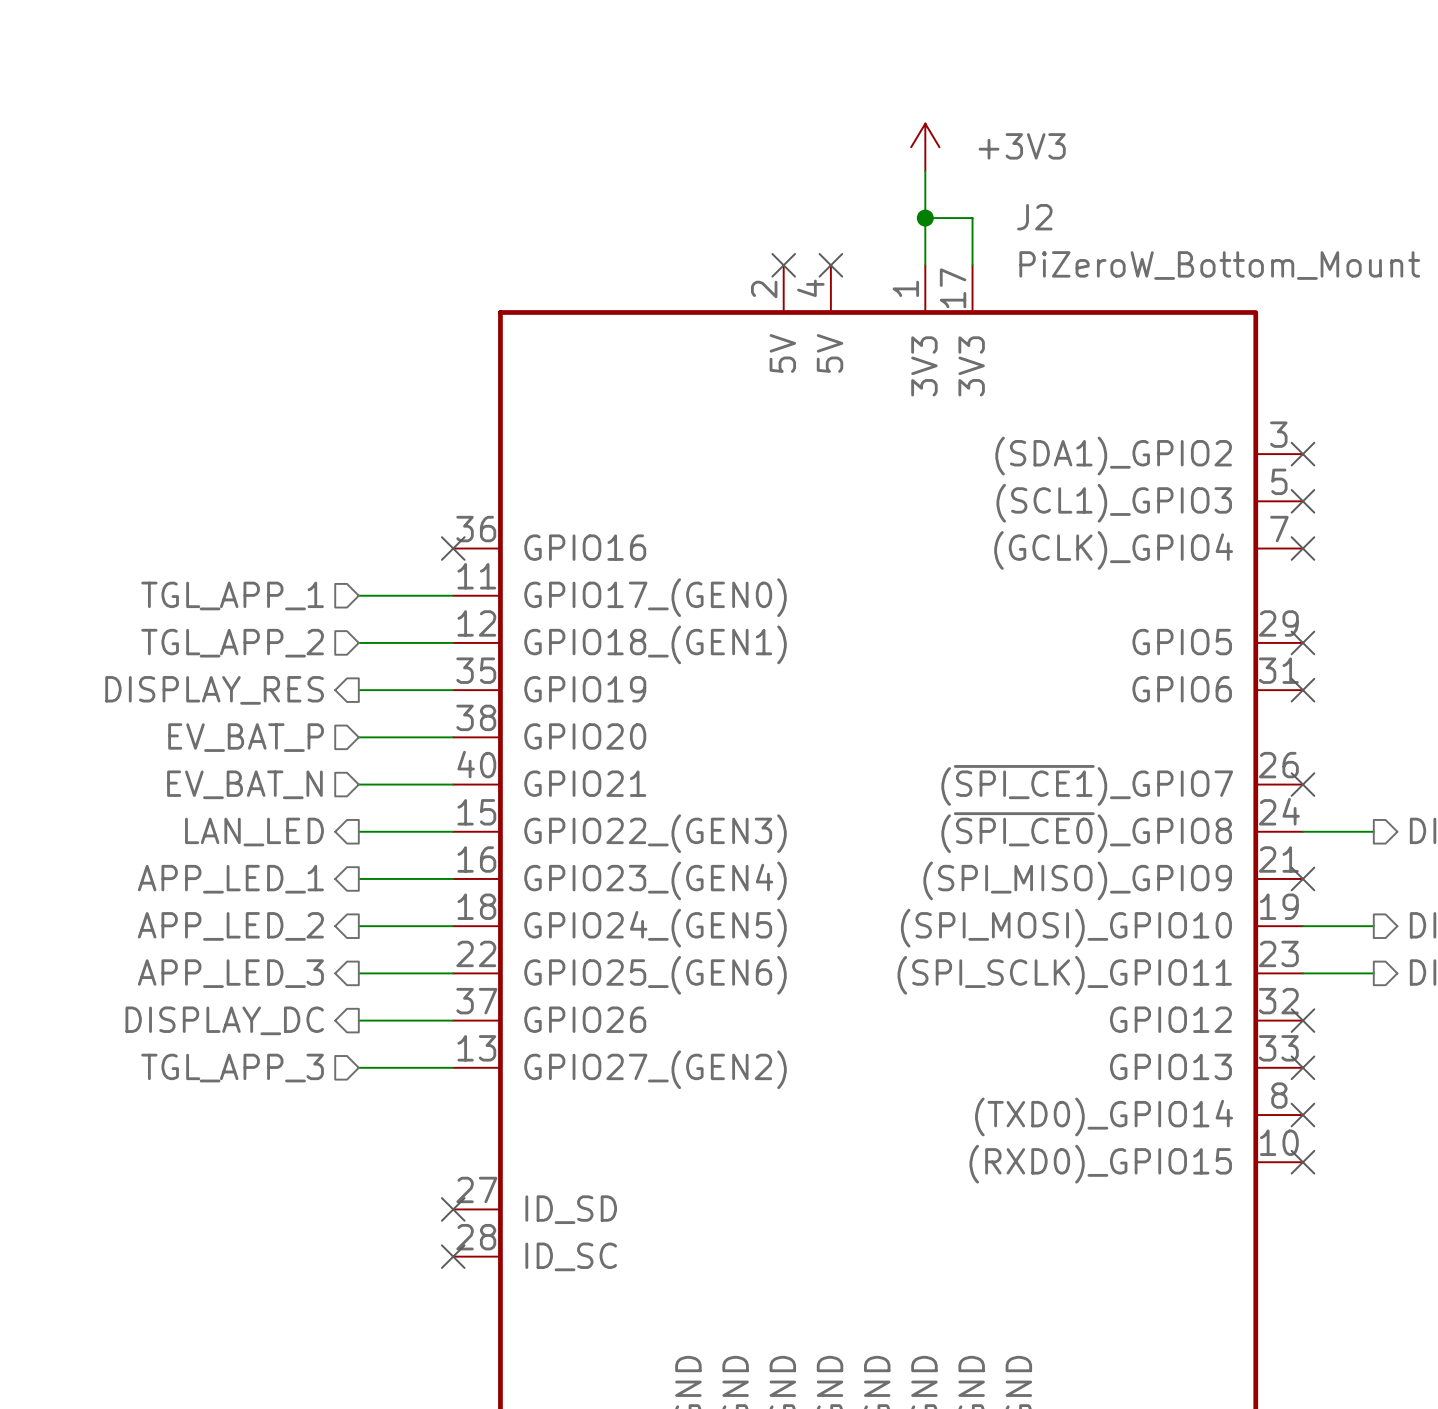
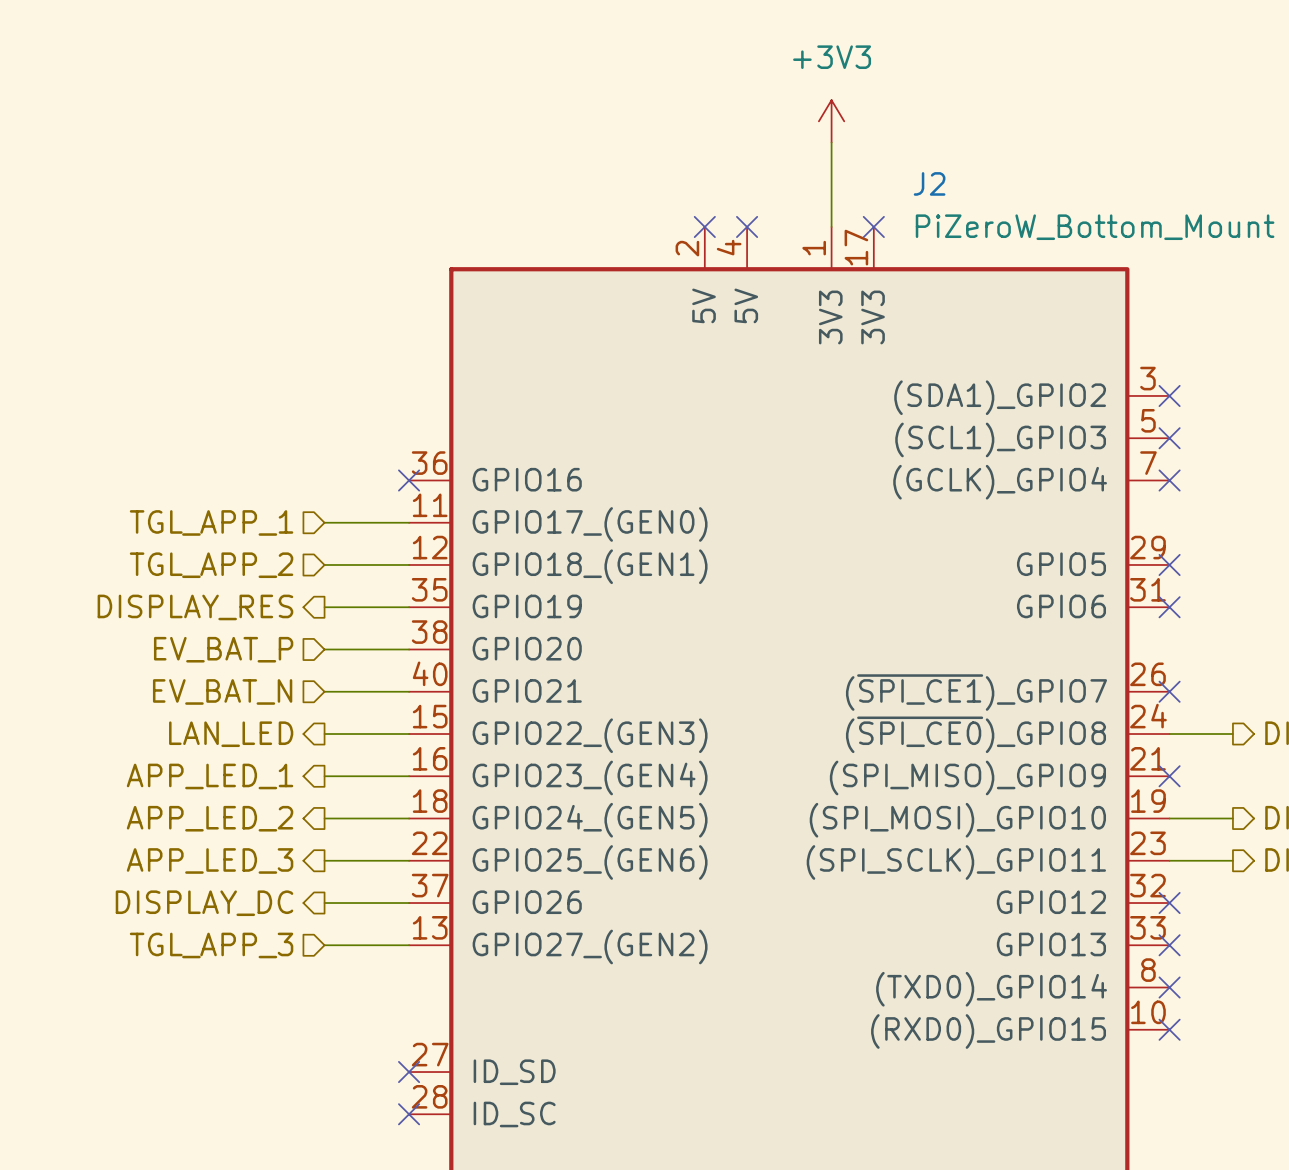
power symbol text position: +3V3 (1022, 146) -> +3V3 (832, 57)
wire: (925, 218) (972, 218) (972, 265) -> none
junction: (925, 218) -> none
no-connect mark: none -> (873, 226)

